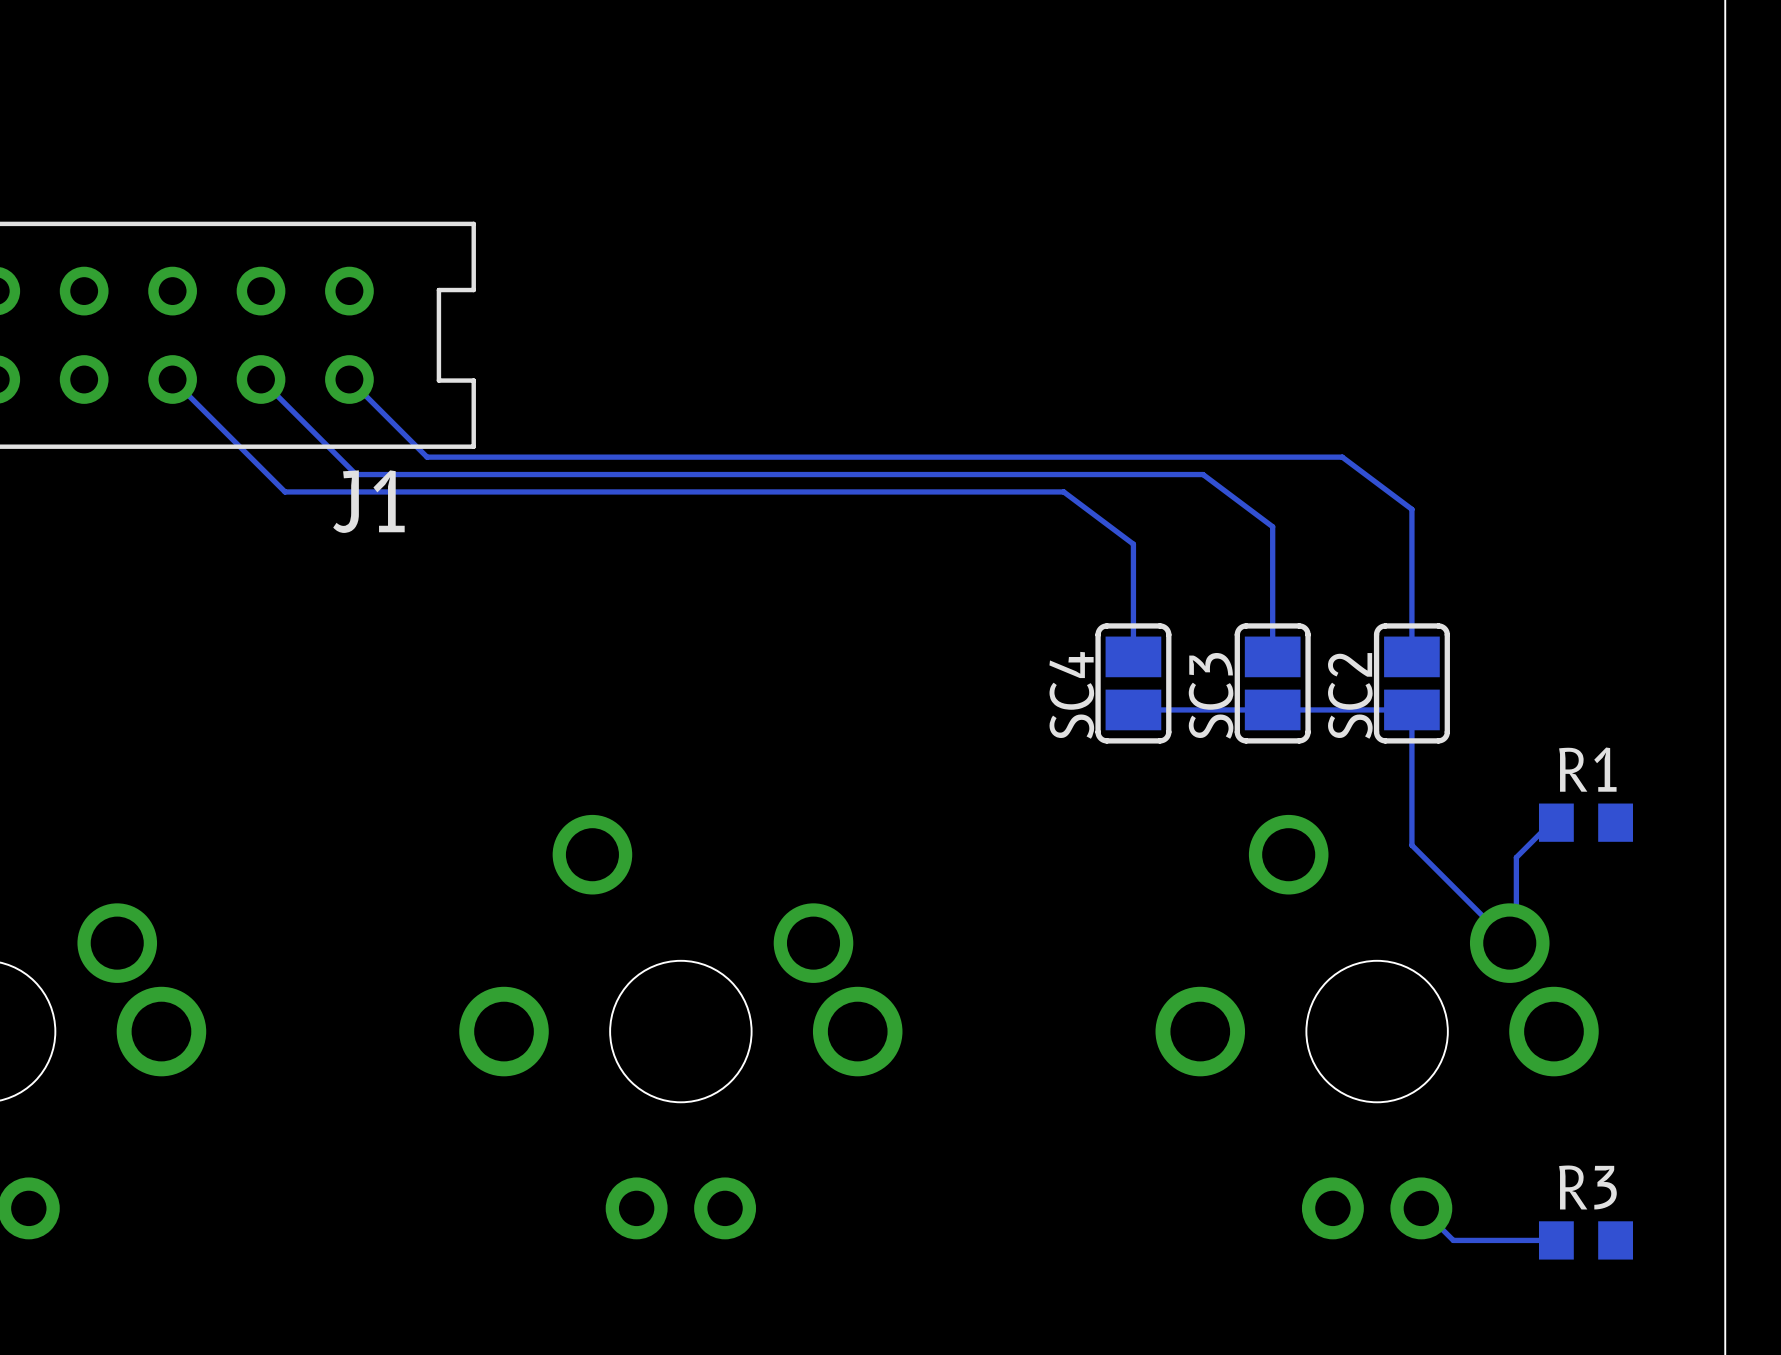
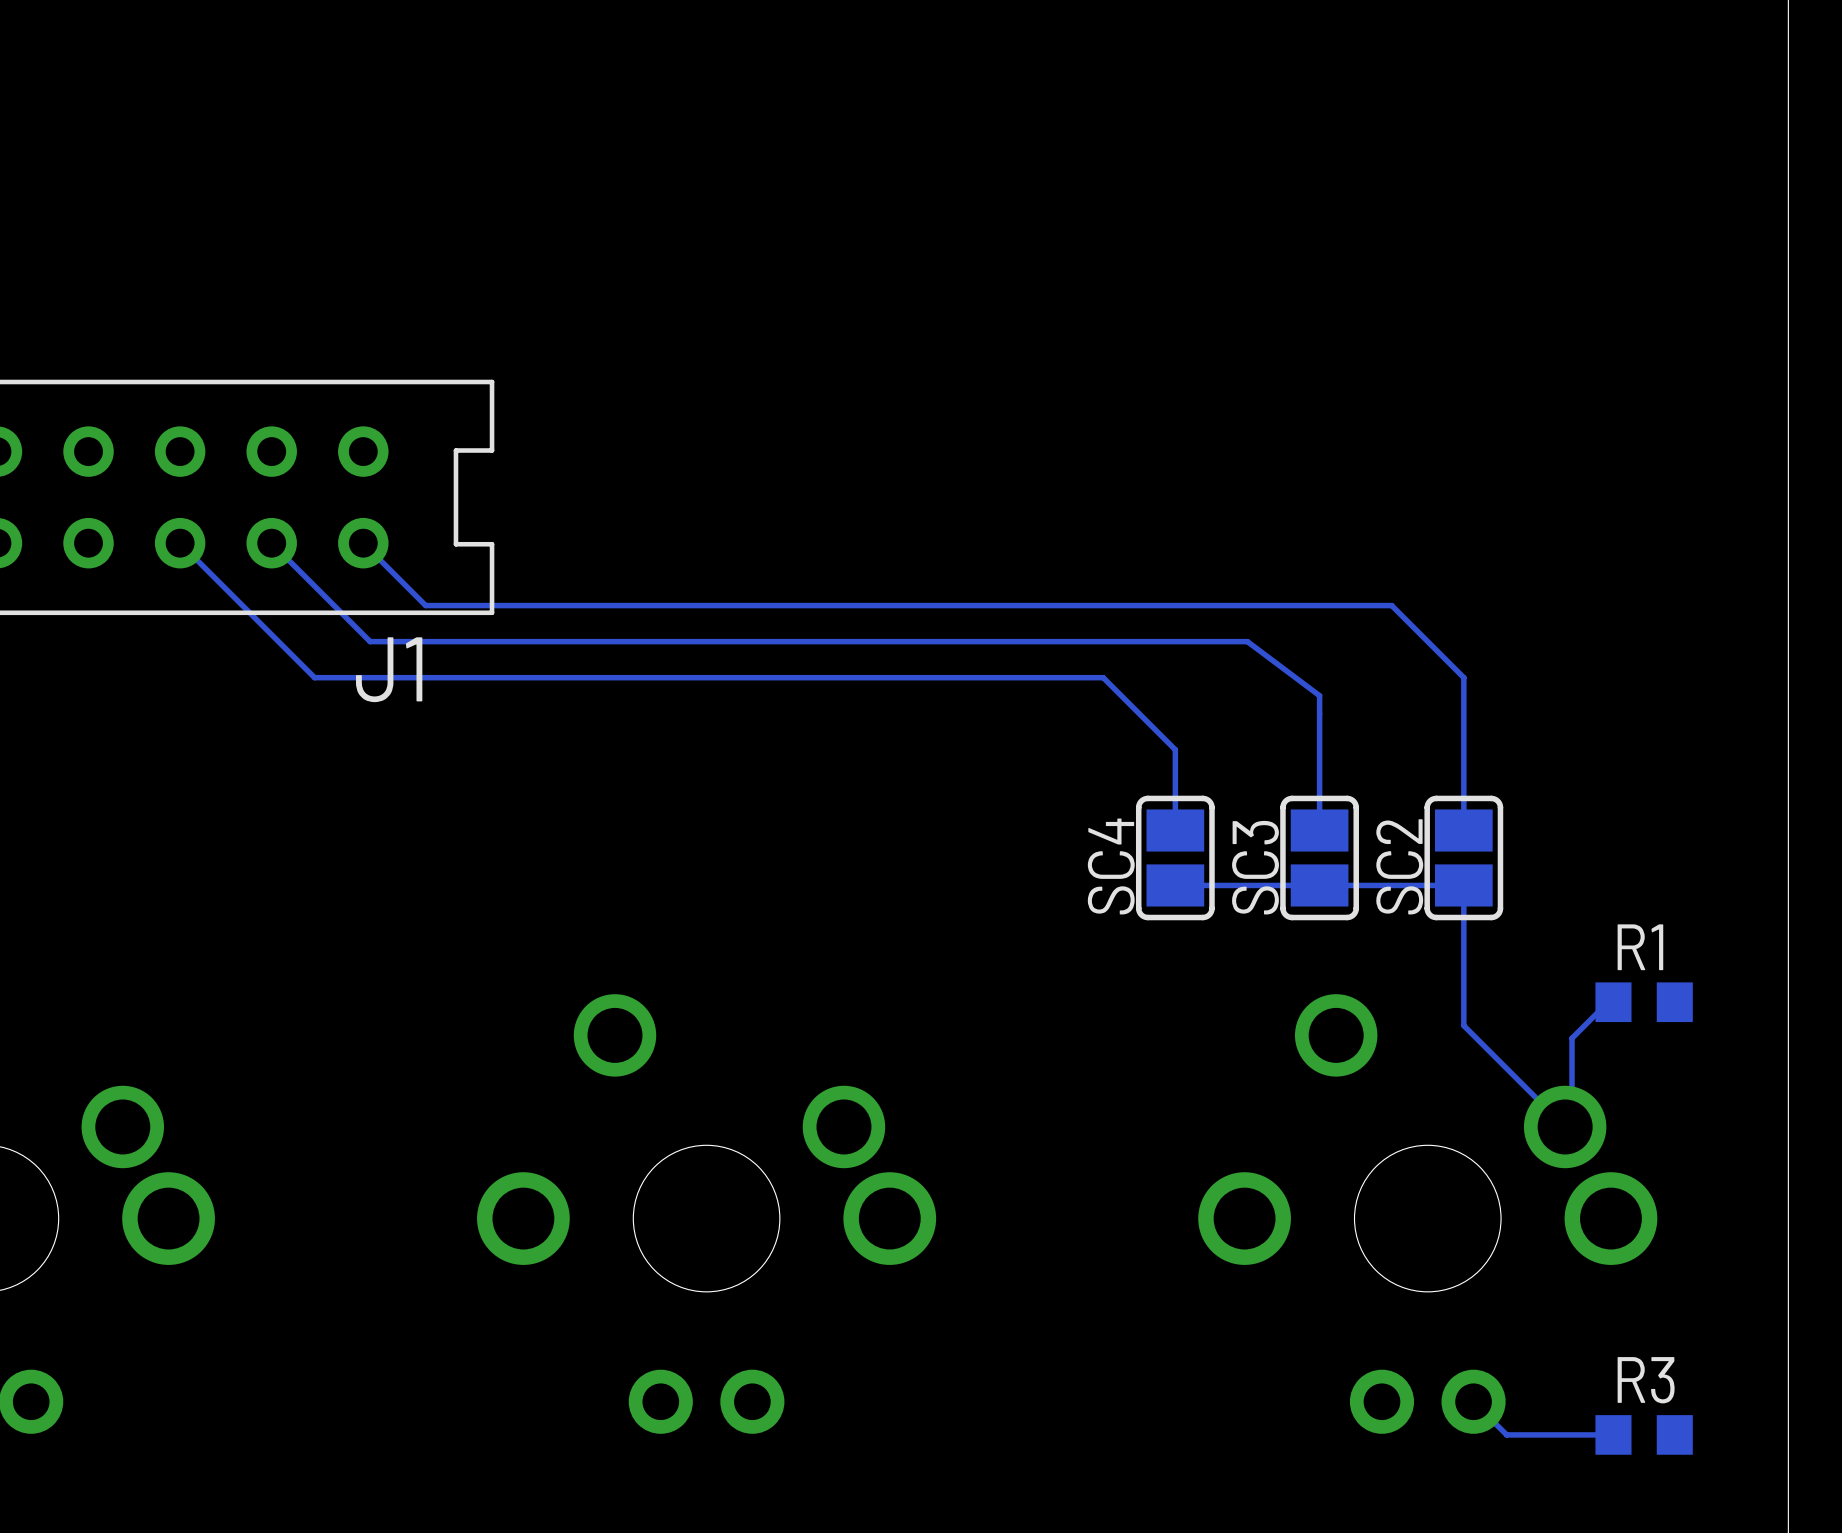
track: (409, 439) (427, 457) (1342, 457) (1411, 509) -> (425, 605) (1391, 605) (1463, 677)
track: (285, 491) (1063, 491) (1133, 544) (1133, 578) -> (296, 659) (314, 677) (1103, 677) (1175, 749)

